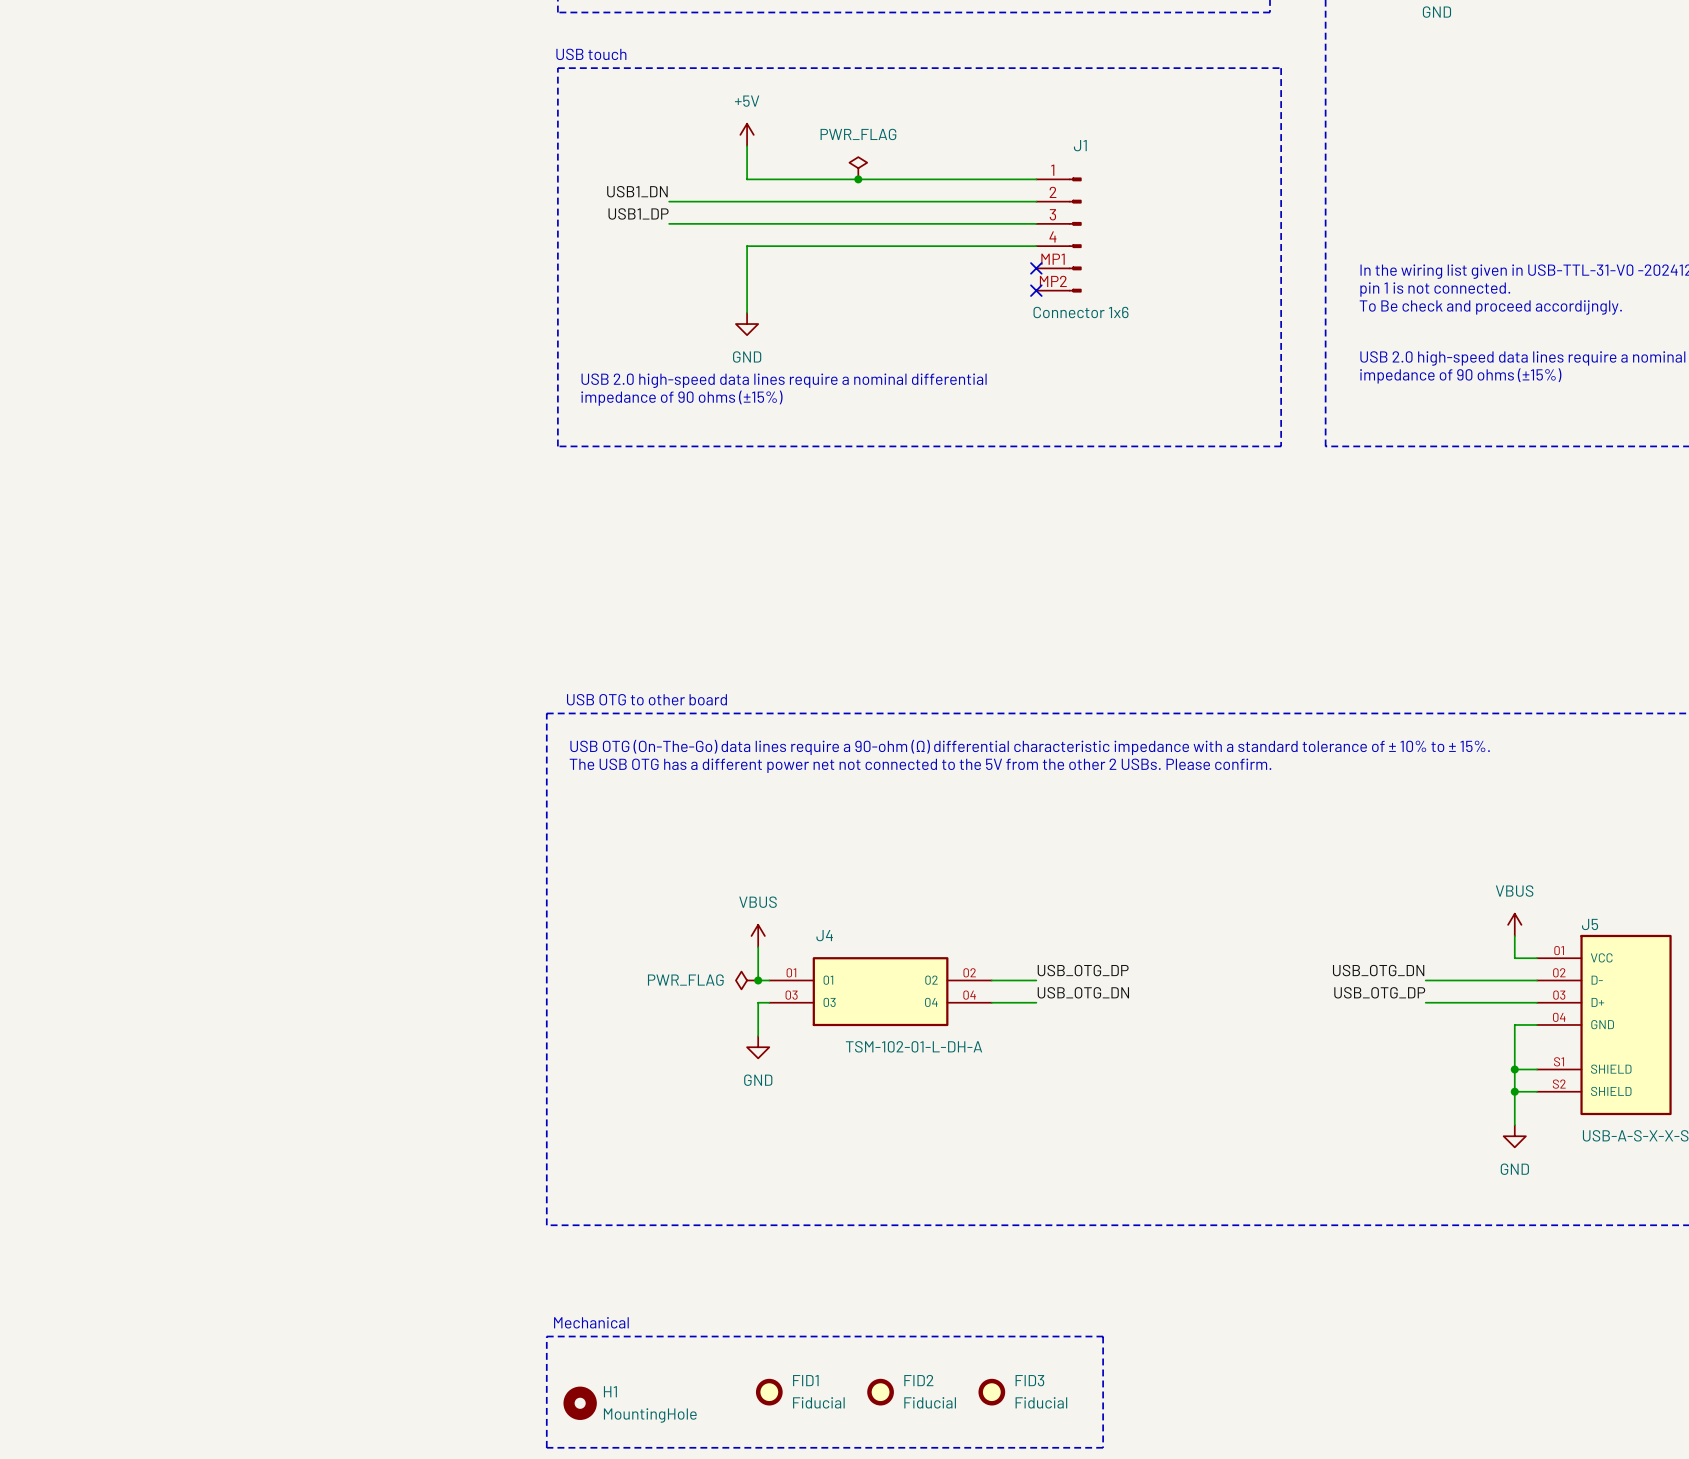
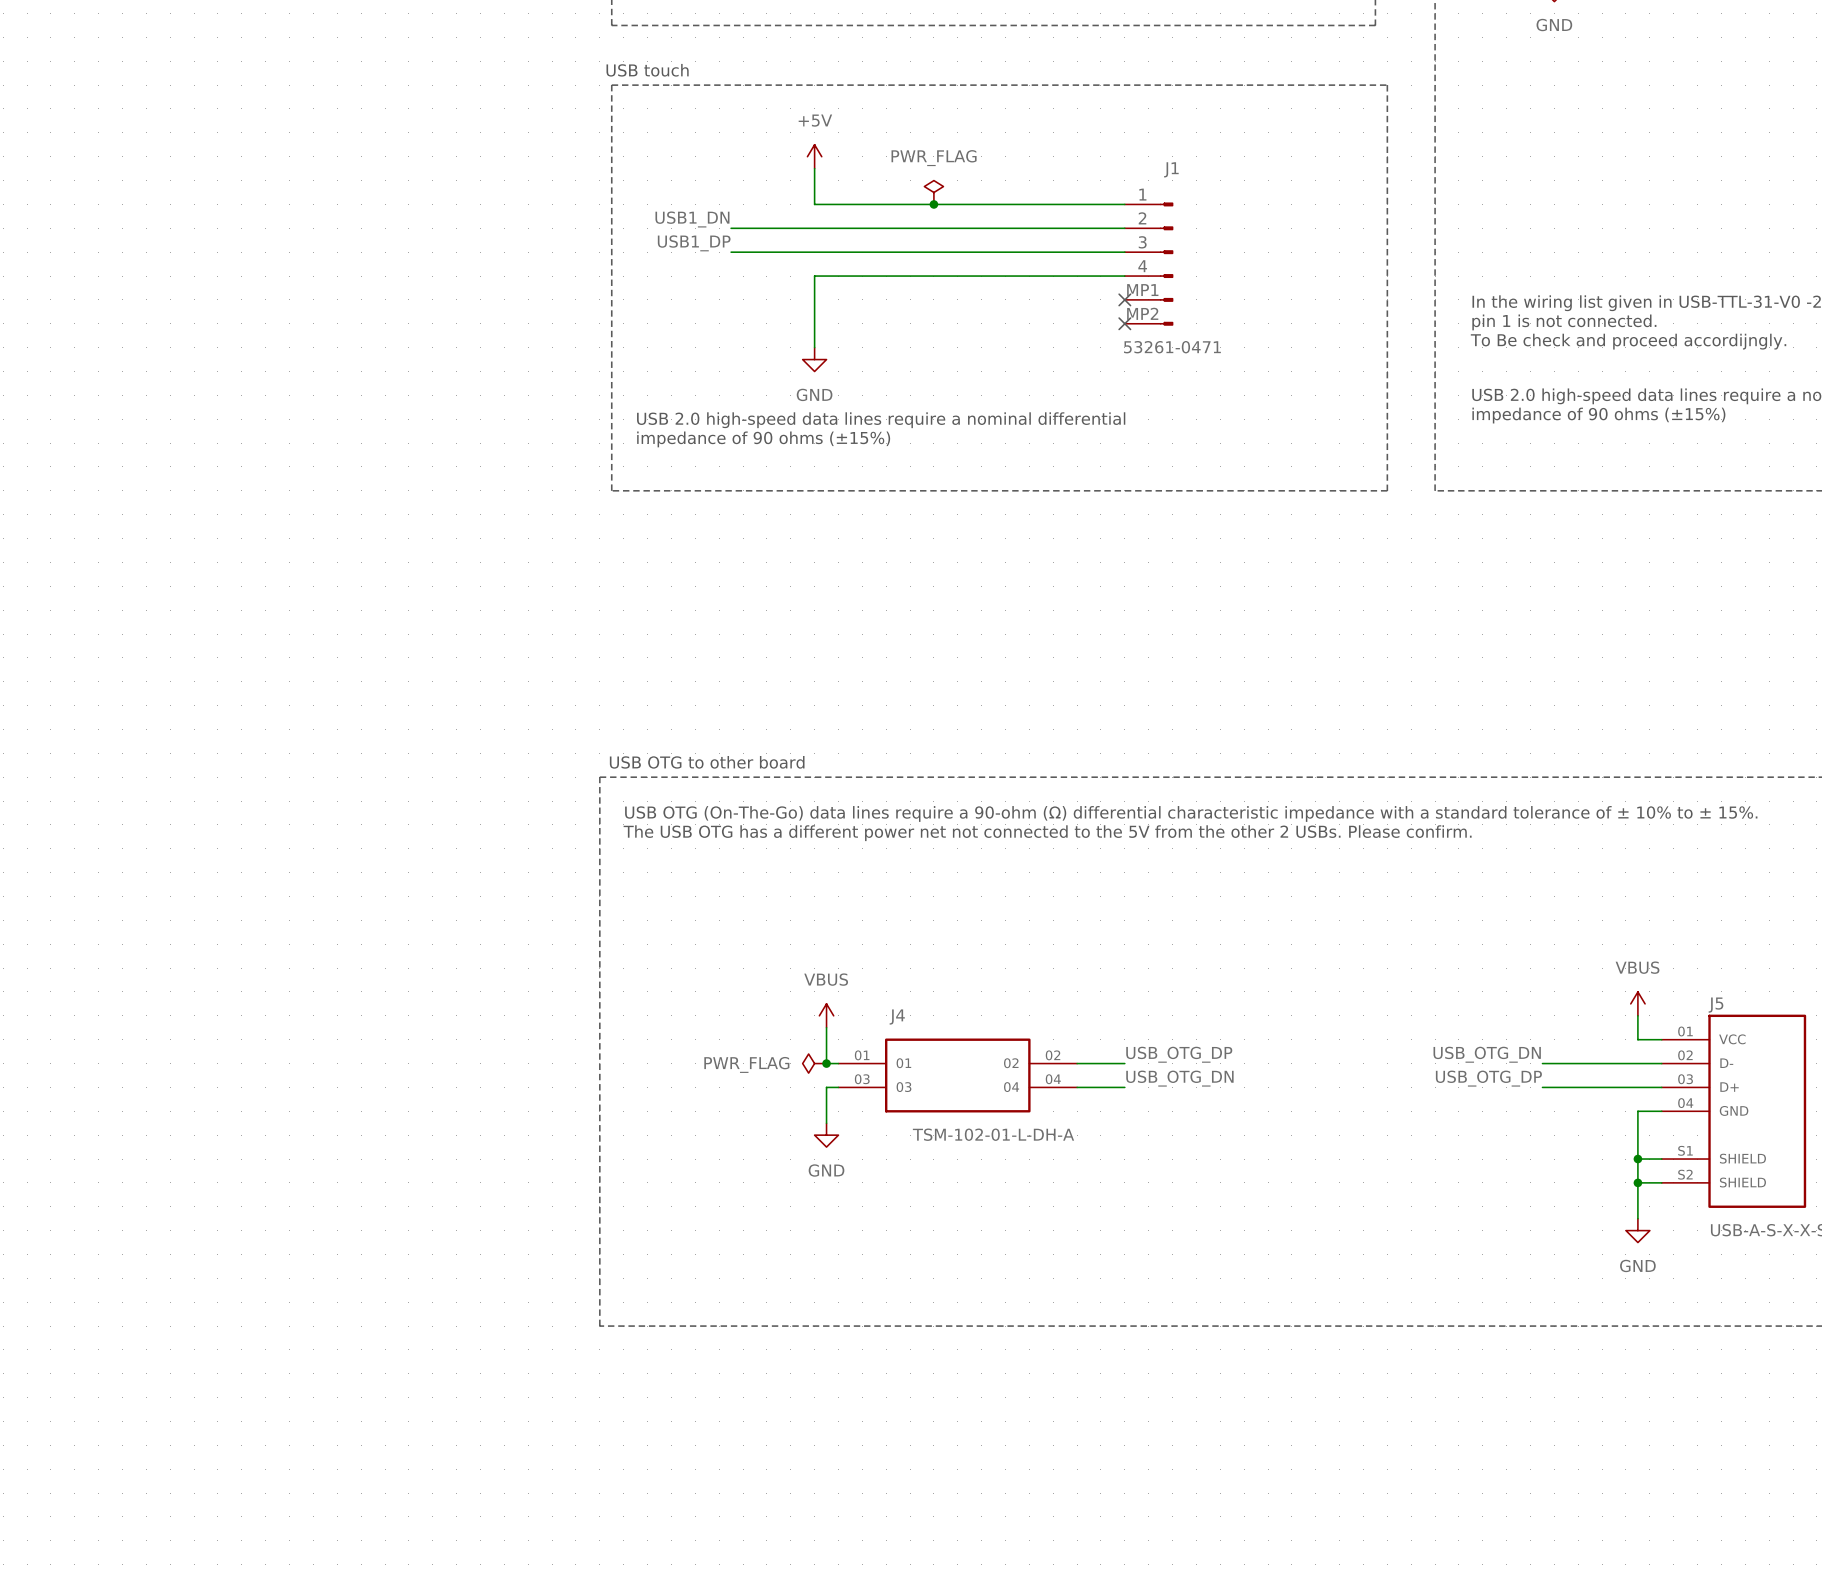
J1 value: Connector 1x6 (1081, 312) -> 53261-0471 (1172, 347)
text: Mechanical (591, 1322) -> none
line: (546, 1336) (1103, 1336) (1103, 1447) (546, 1447) (546, 1336) -> none
FID1: Fiducial (769, 1392) -> none
FID2: Fiducial (880, 1392) -> none
FID3: Fiducial (991, 1392) -> none
H1: MountingHole (580, 1403) -> none

